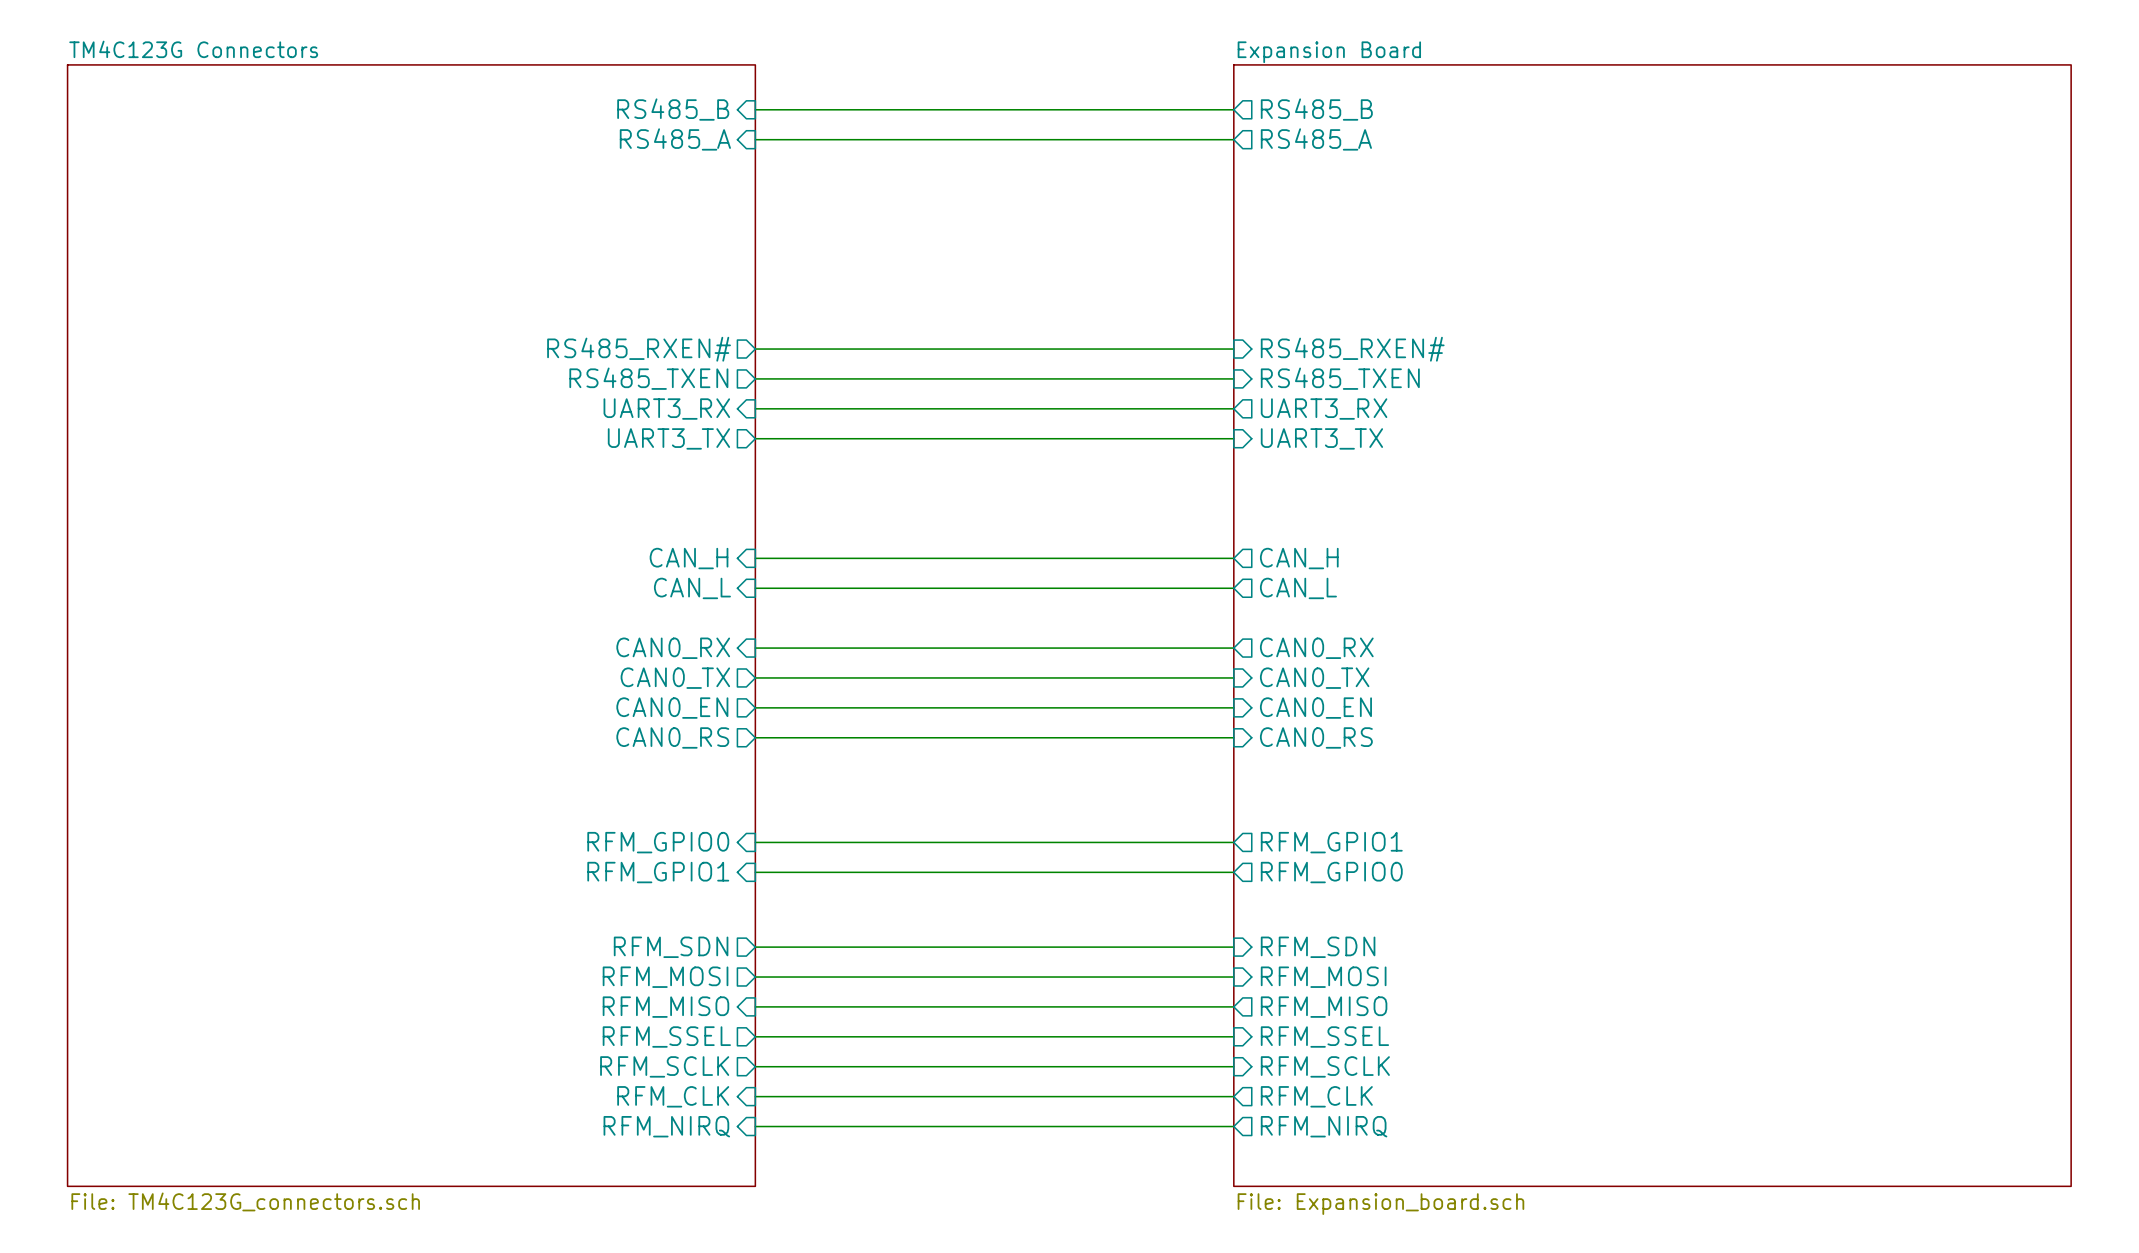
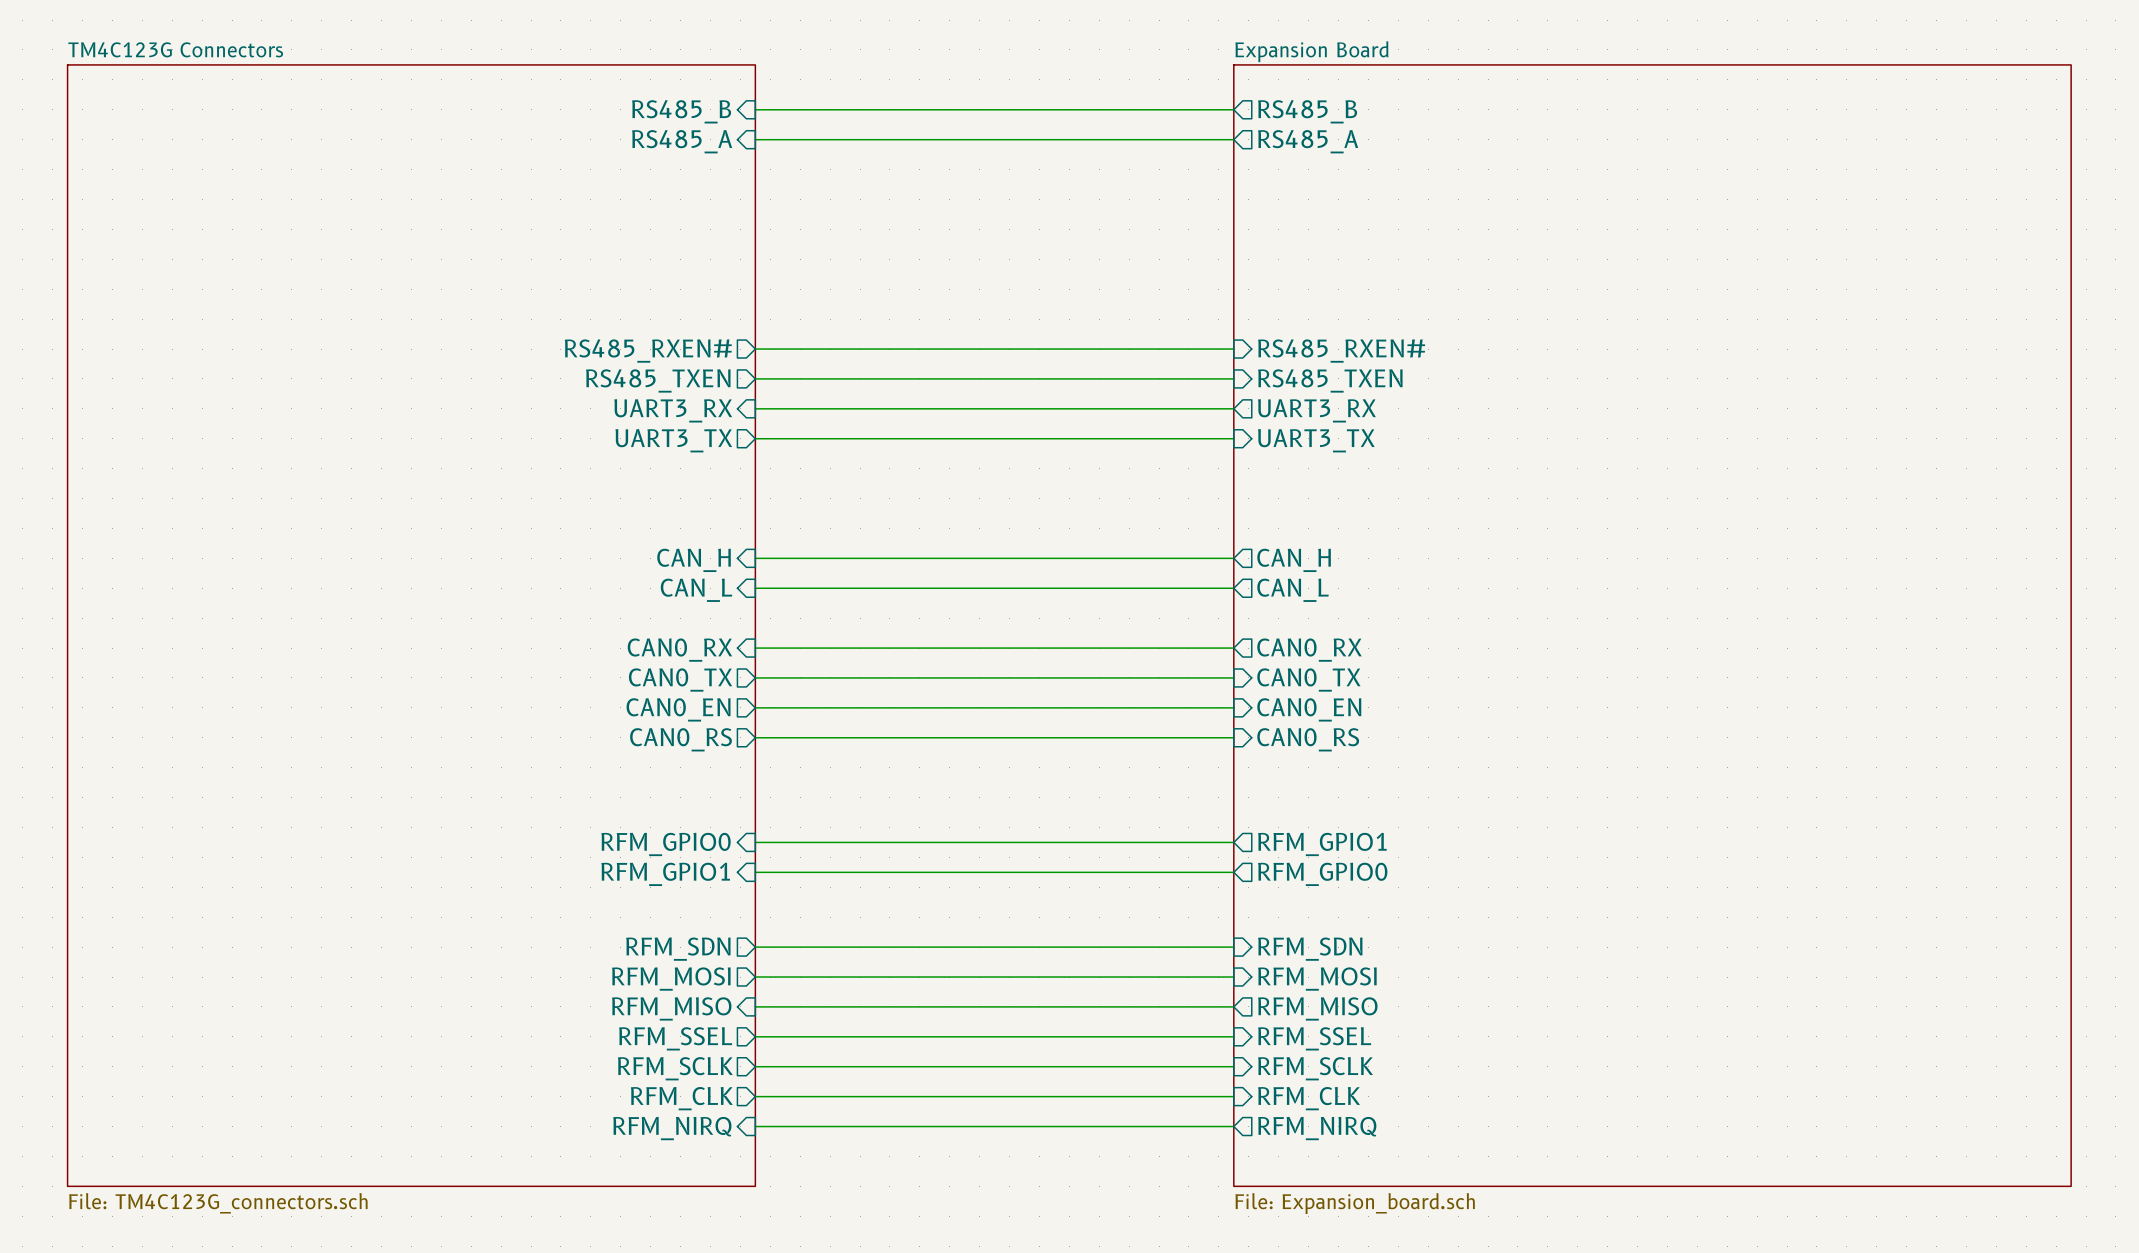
sheet pin shape: input (673, 1096) -> output (681, 1098)
sheet pin shape: output (1316, 1096) -> input (1309, 1098)

